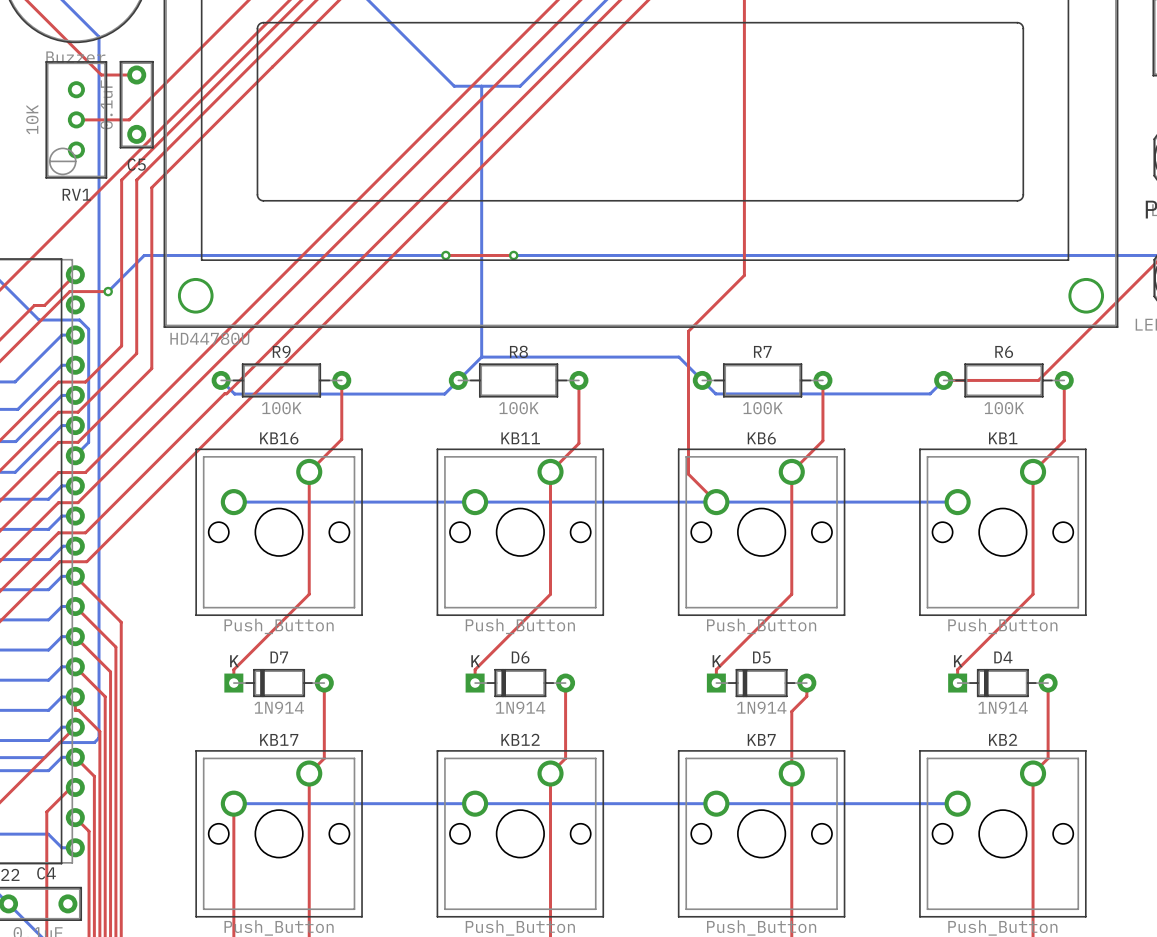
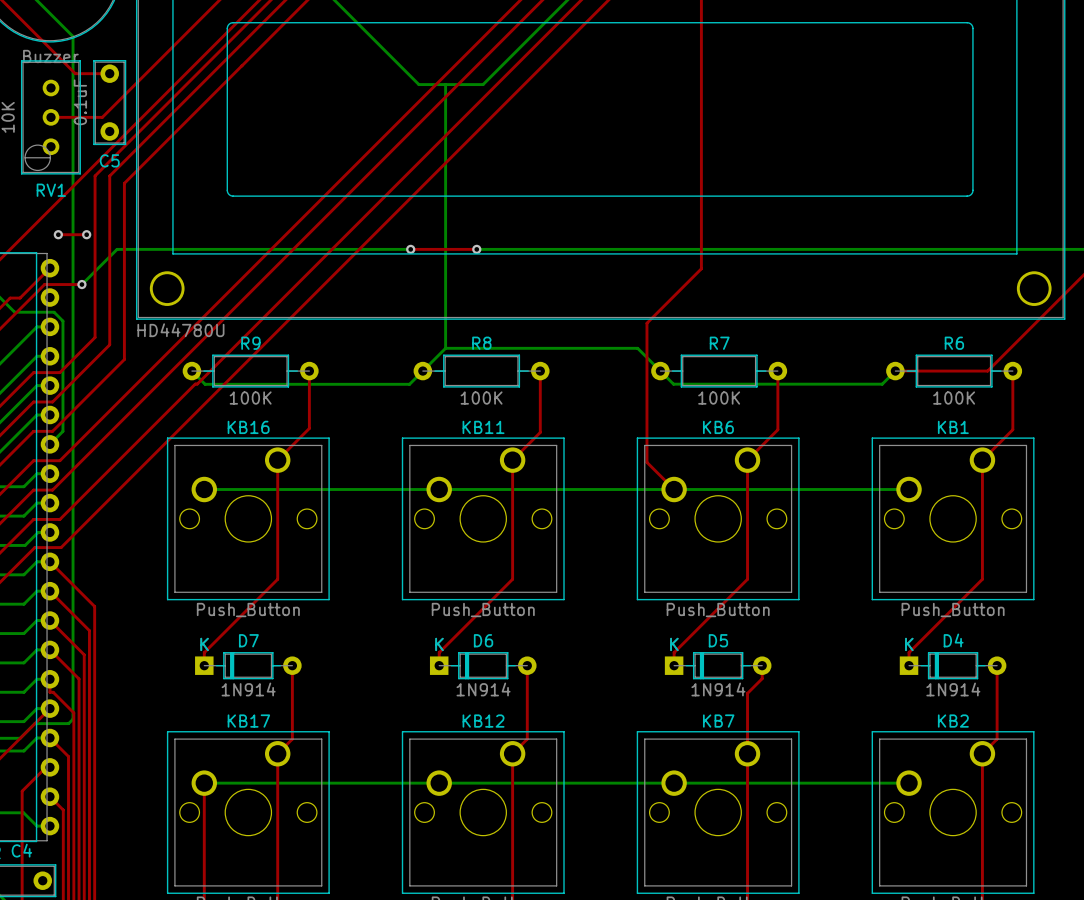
top track: none -> (58, 234) (86, 234)
via: none -> (58, 234)
via: none -> (86, 234)

